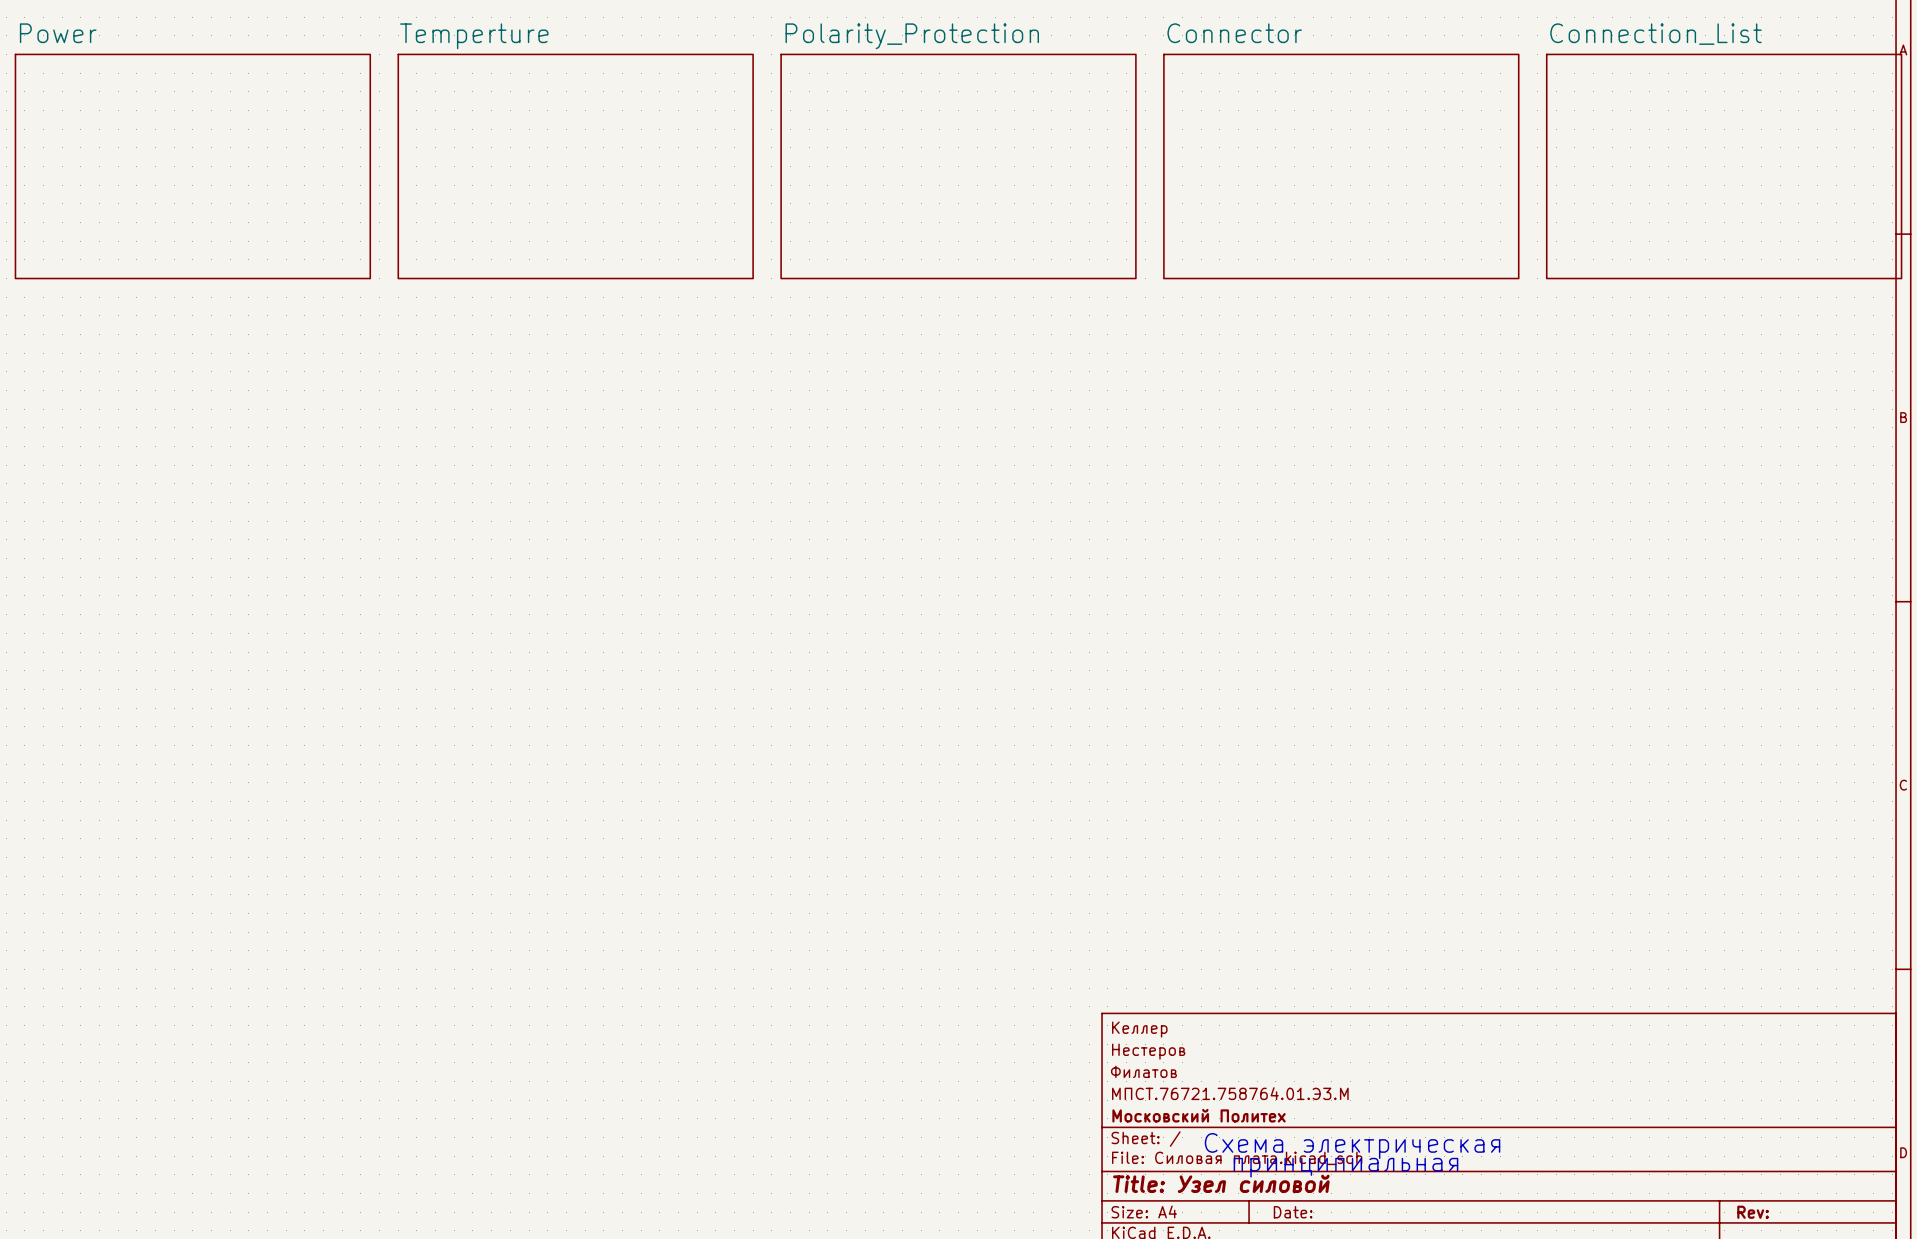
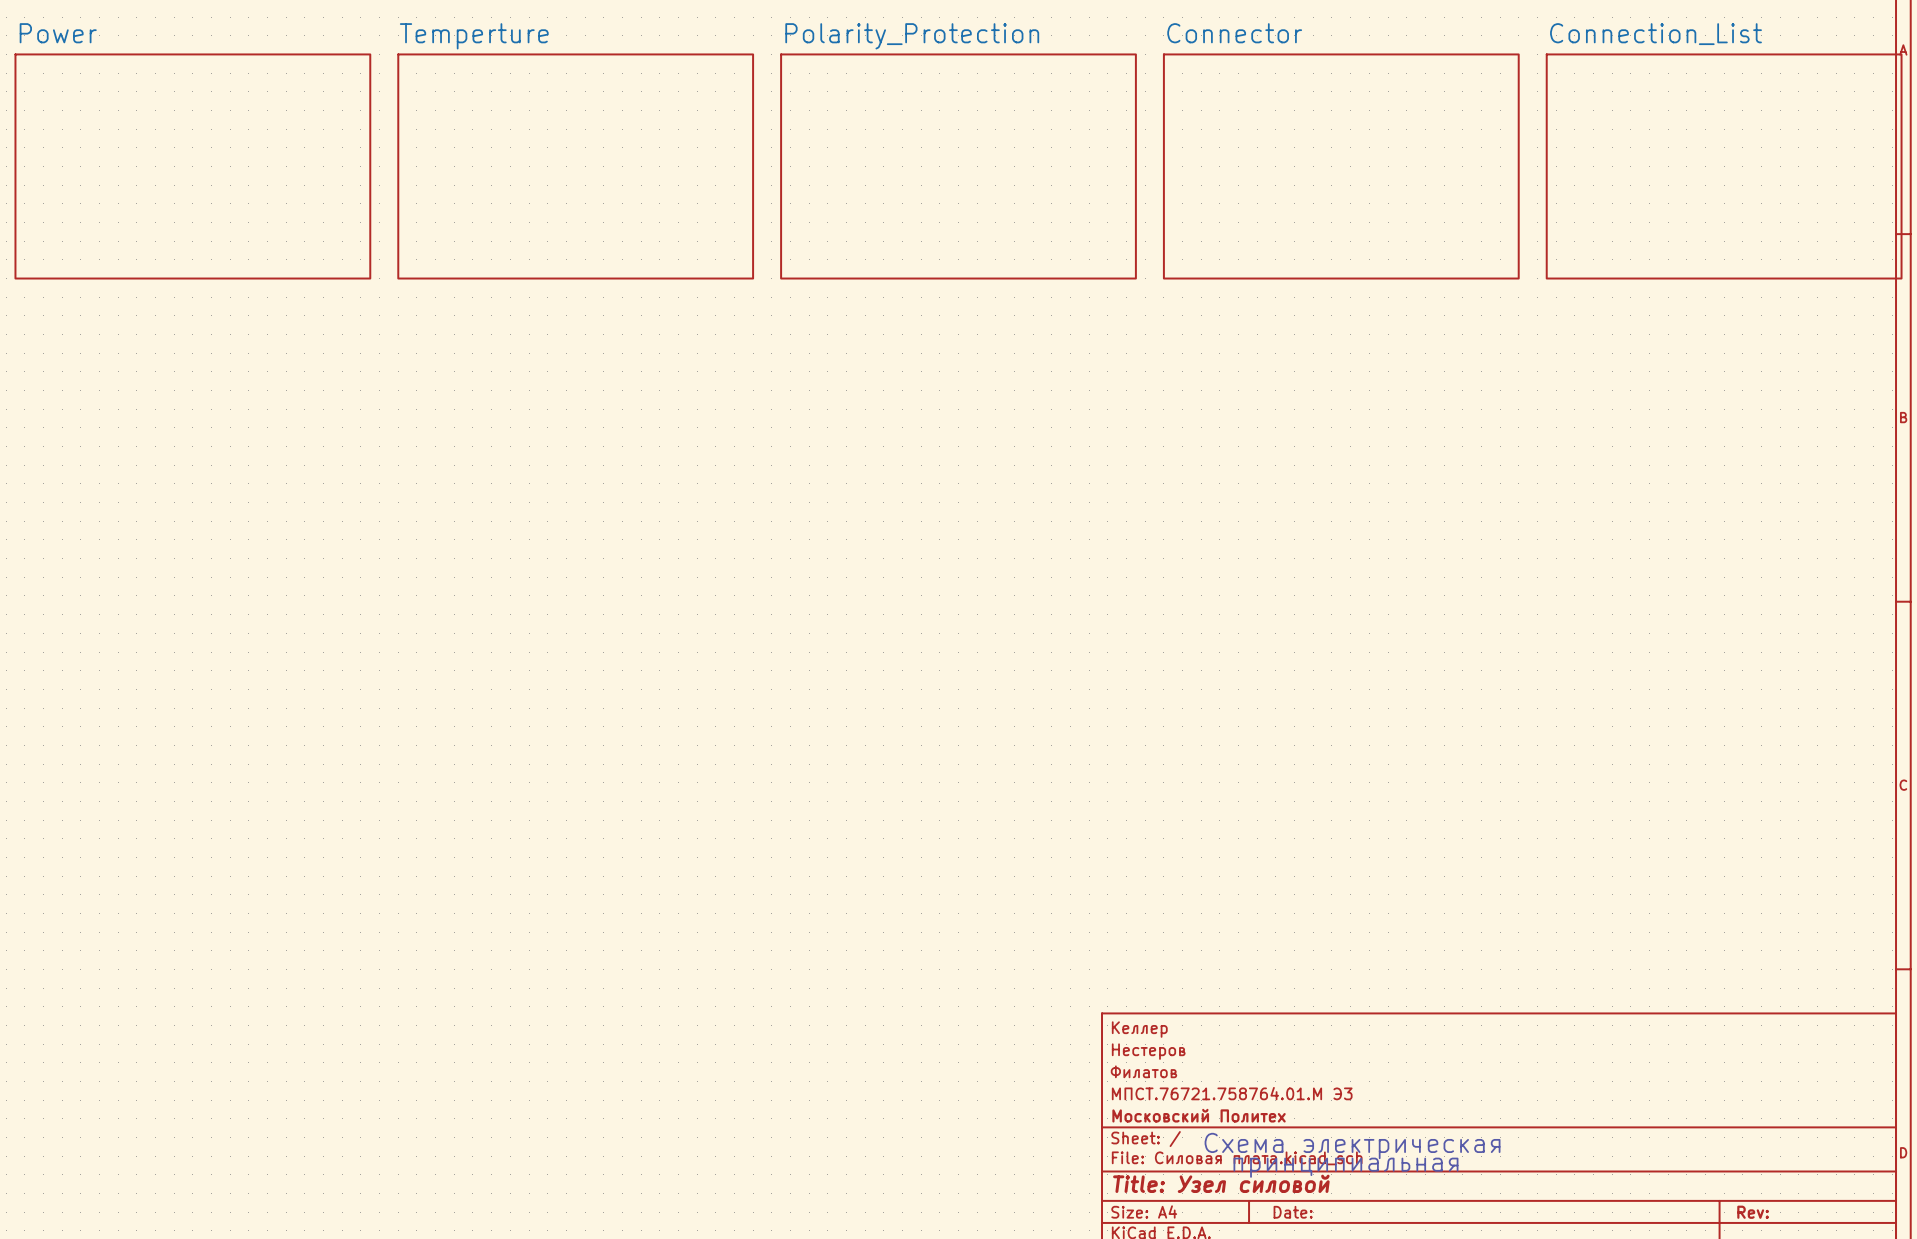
title block: МПСТ.76721.758764.01.Э3.М (1230, 1093) -> МПСТ.76721.758764.01.М Э3 (1232, 1093)

